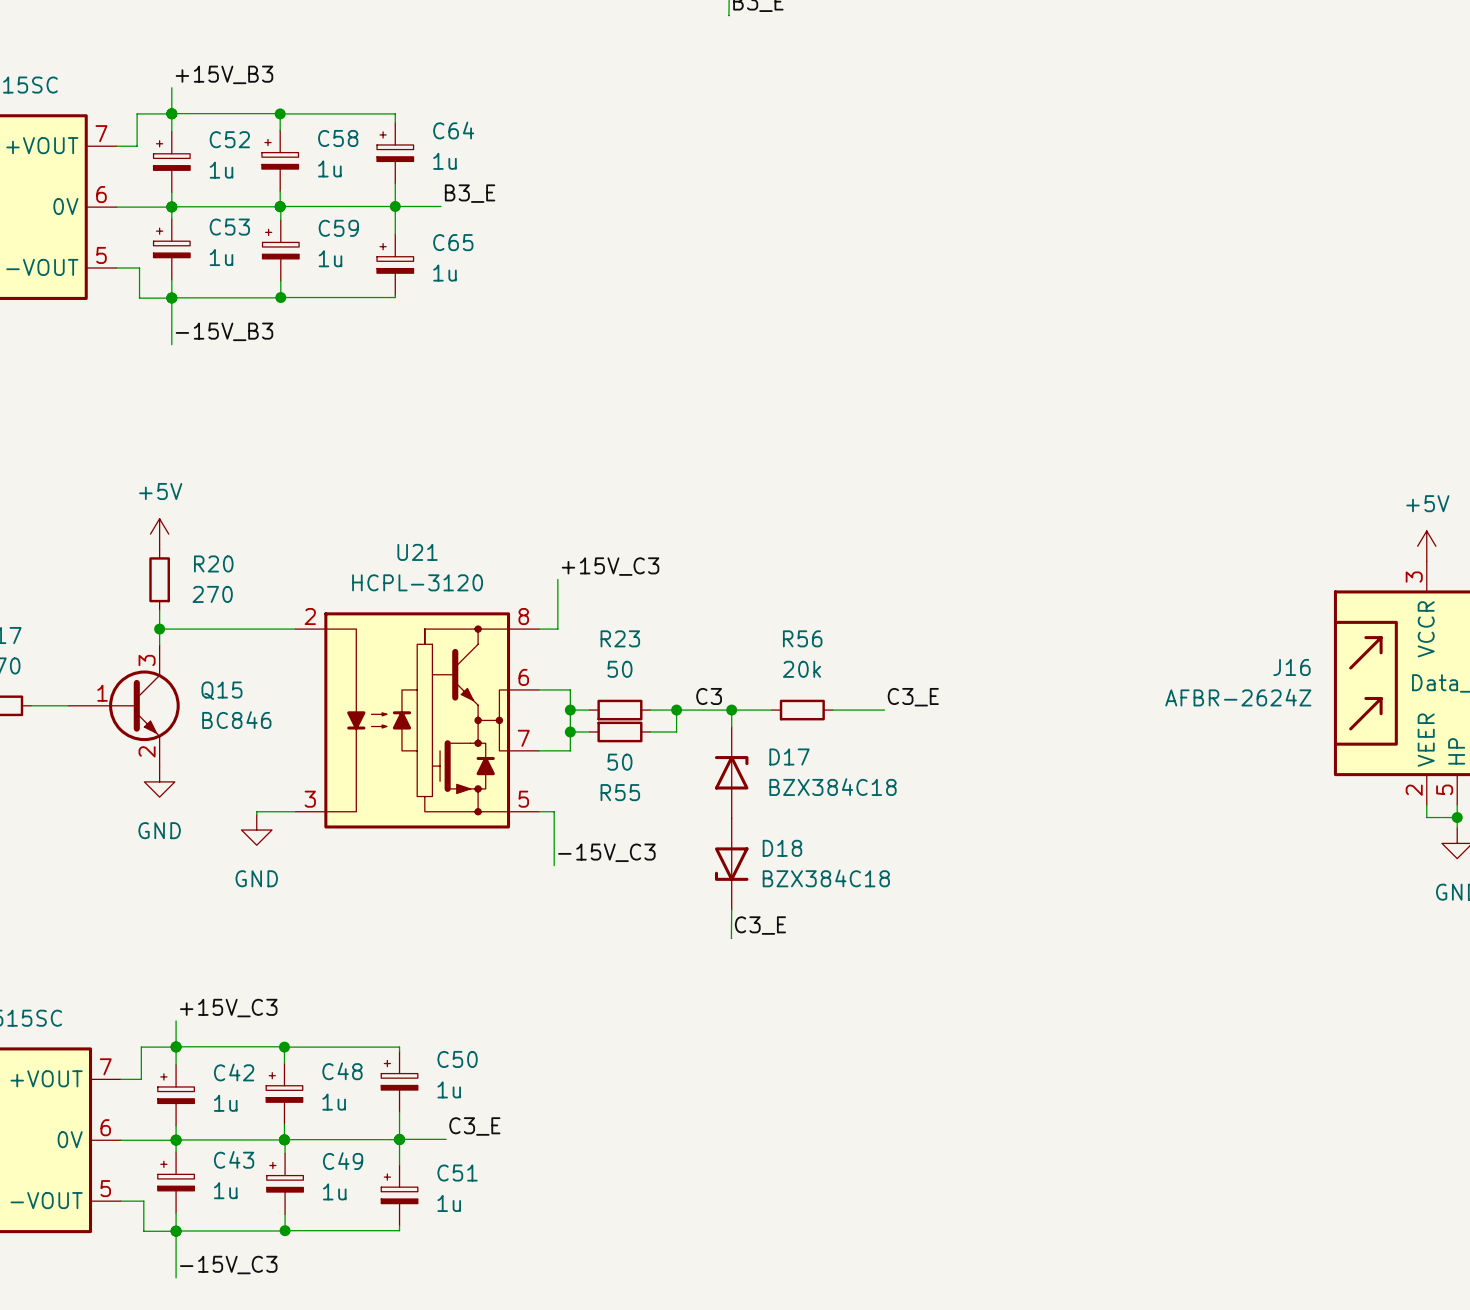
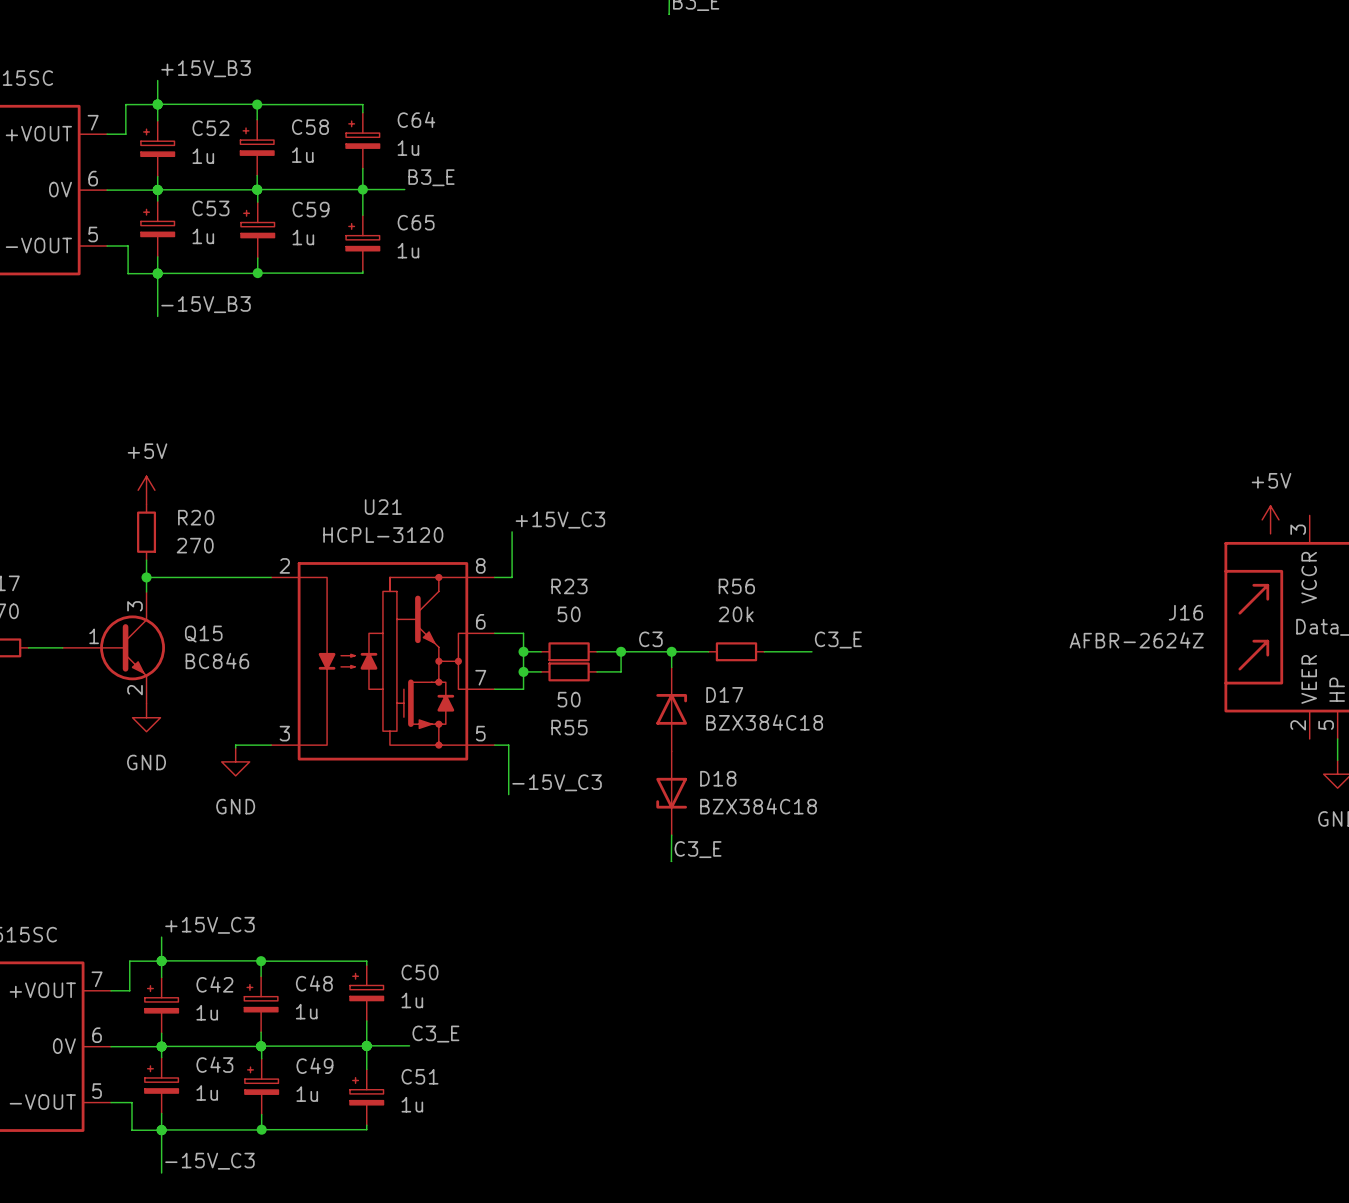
power symbol position: +5V (1426, 546) -> +5V (1270, 519)
wire: (1426, 805) (1426, 817) (1457, 817) -> none
junction: (1457, 817) -> none

